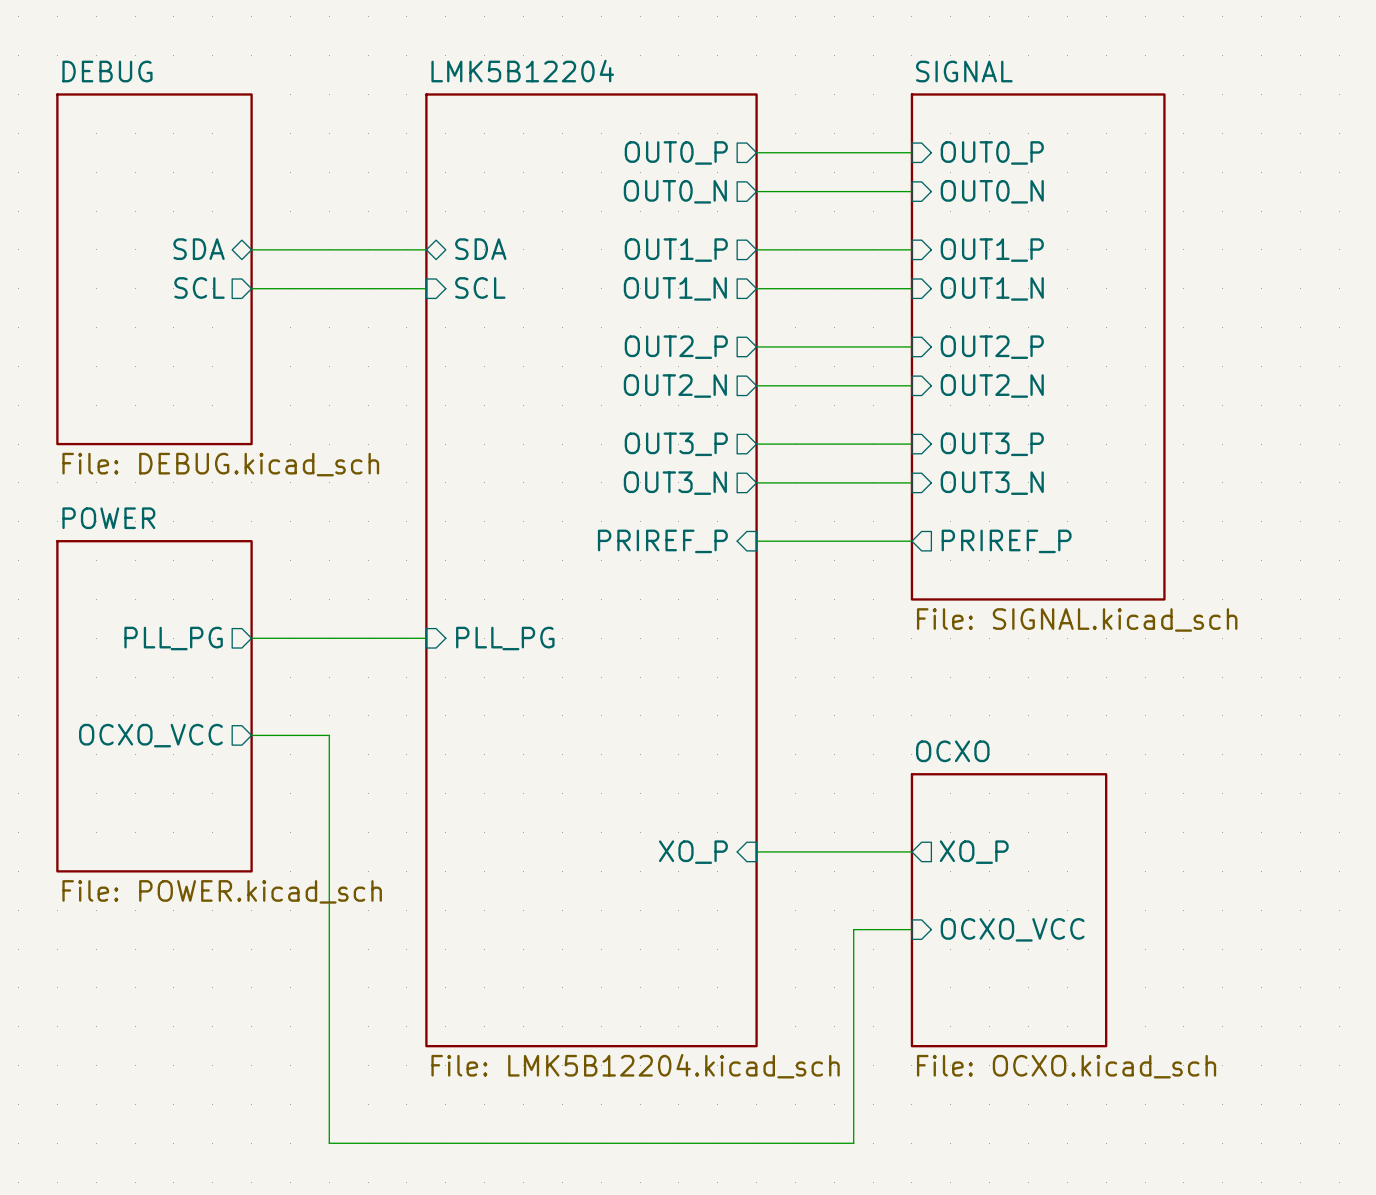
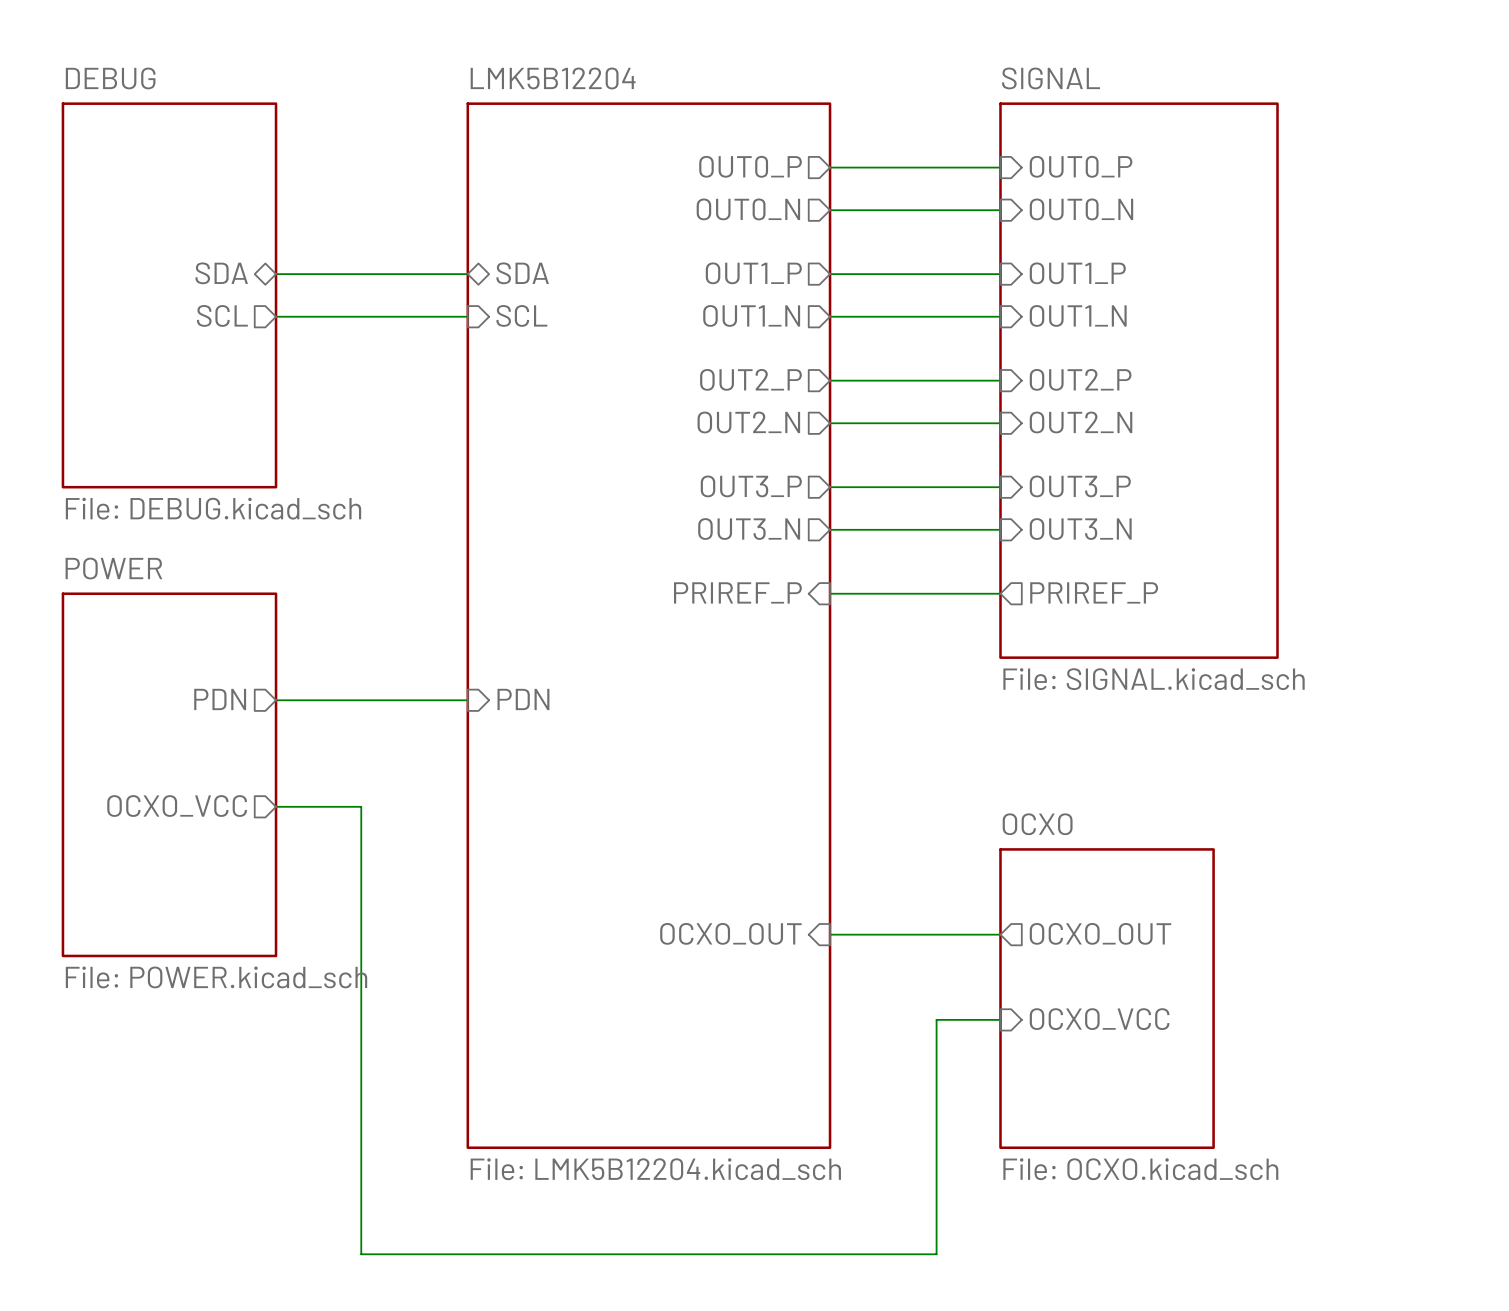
sheet pin: PLL_PG (173, 638) -> PDN (220, 699)
sheet pin: PLL_PG (505, 638) -> PDN (523, 699)
sheet pin: XO_P (693, 852) -> OCXO_OUT (730, 933)
sheet pin: XO_P (974, 852) -> OCXO_OUT (1100, 933)

